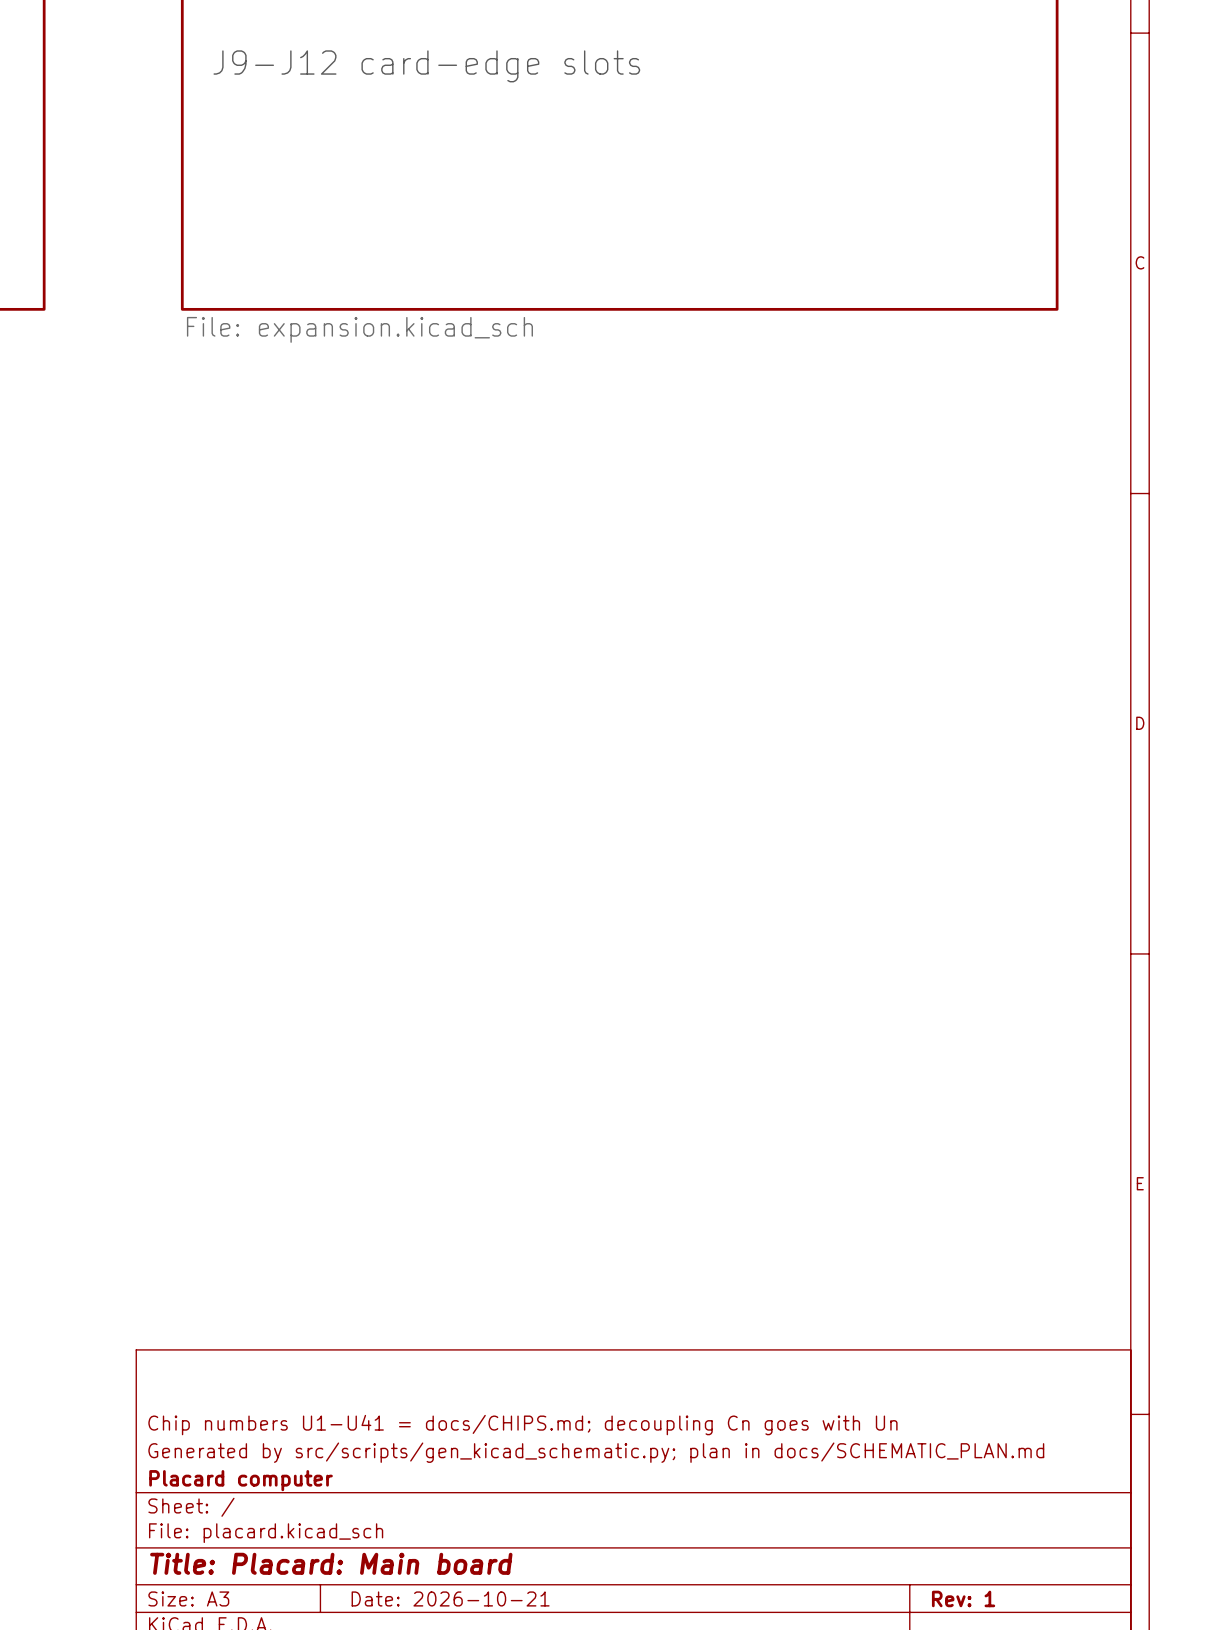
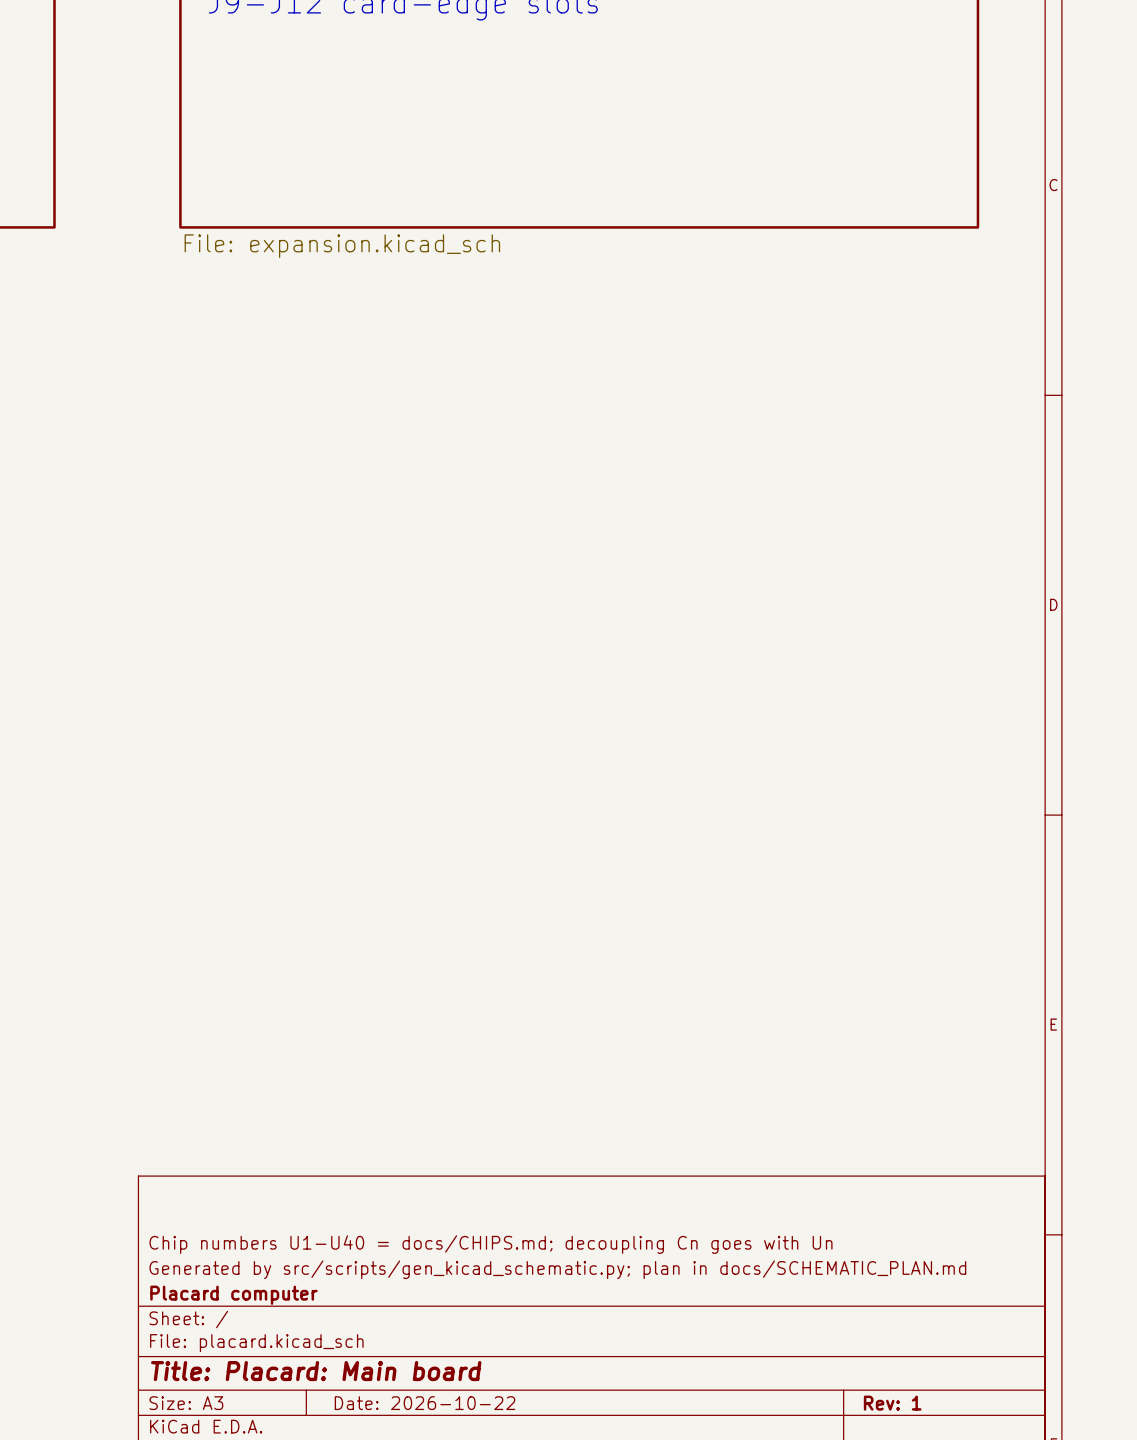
title block: Chip numbers U1-U41 = docs/CHIPS.md; decoupling Cn goes with Un (522, 1425) -> Chip numbers U1-U40 = docs/CHIPS.md; decoupling Cn goes with Un (490, 1244)
title block: Date: 2026-10-21 (450, 1598) -> Date: 2026-10-22 (425, 1403)

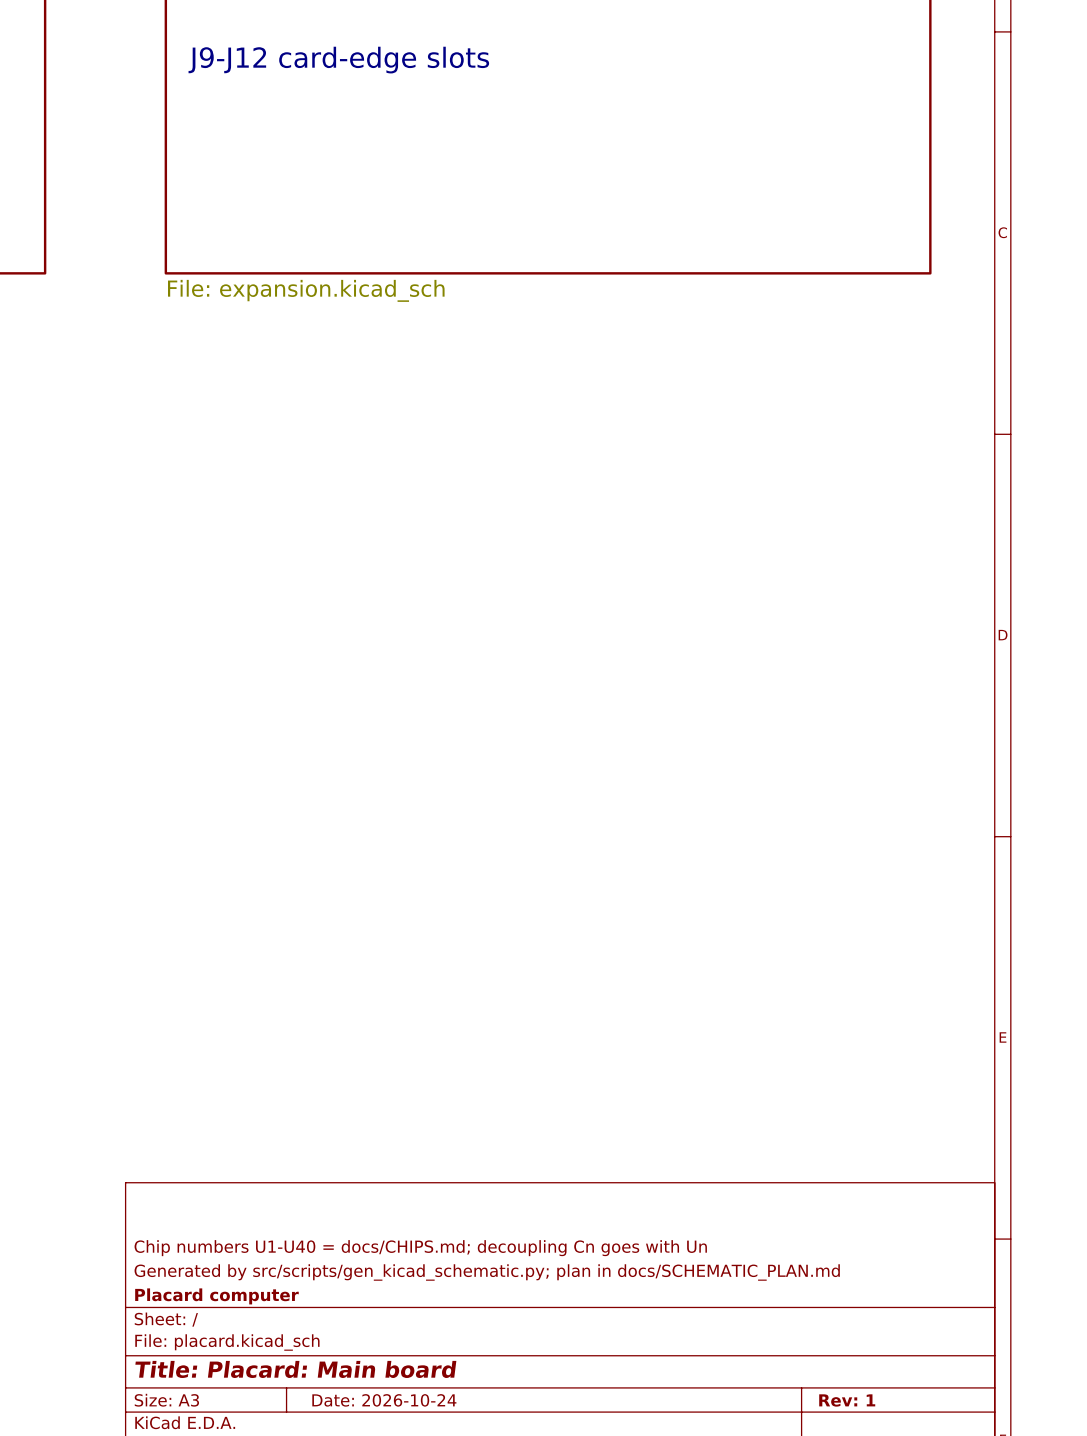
title block: Date: 2026-10-22 (425, 1403) -> Date: 2026-10-24 (384, 1400)

